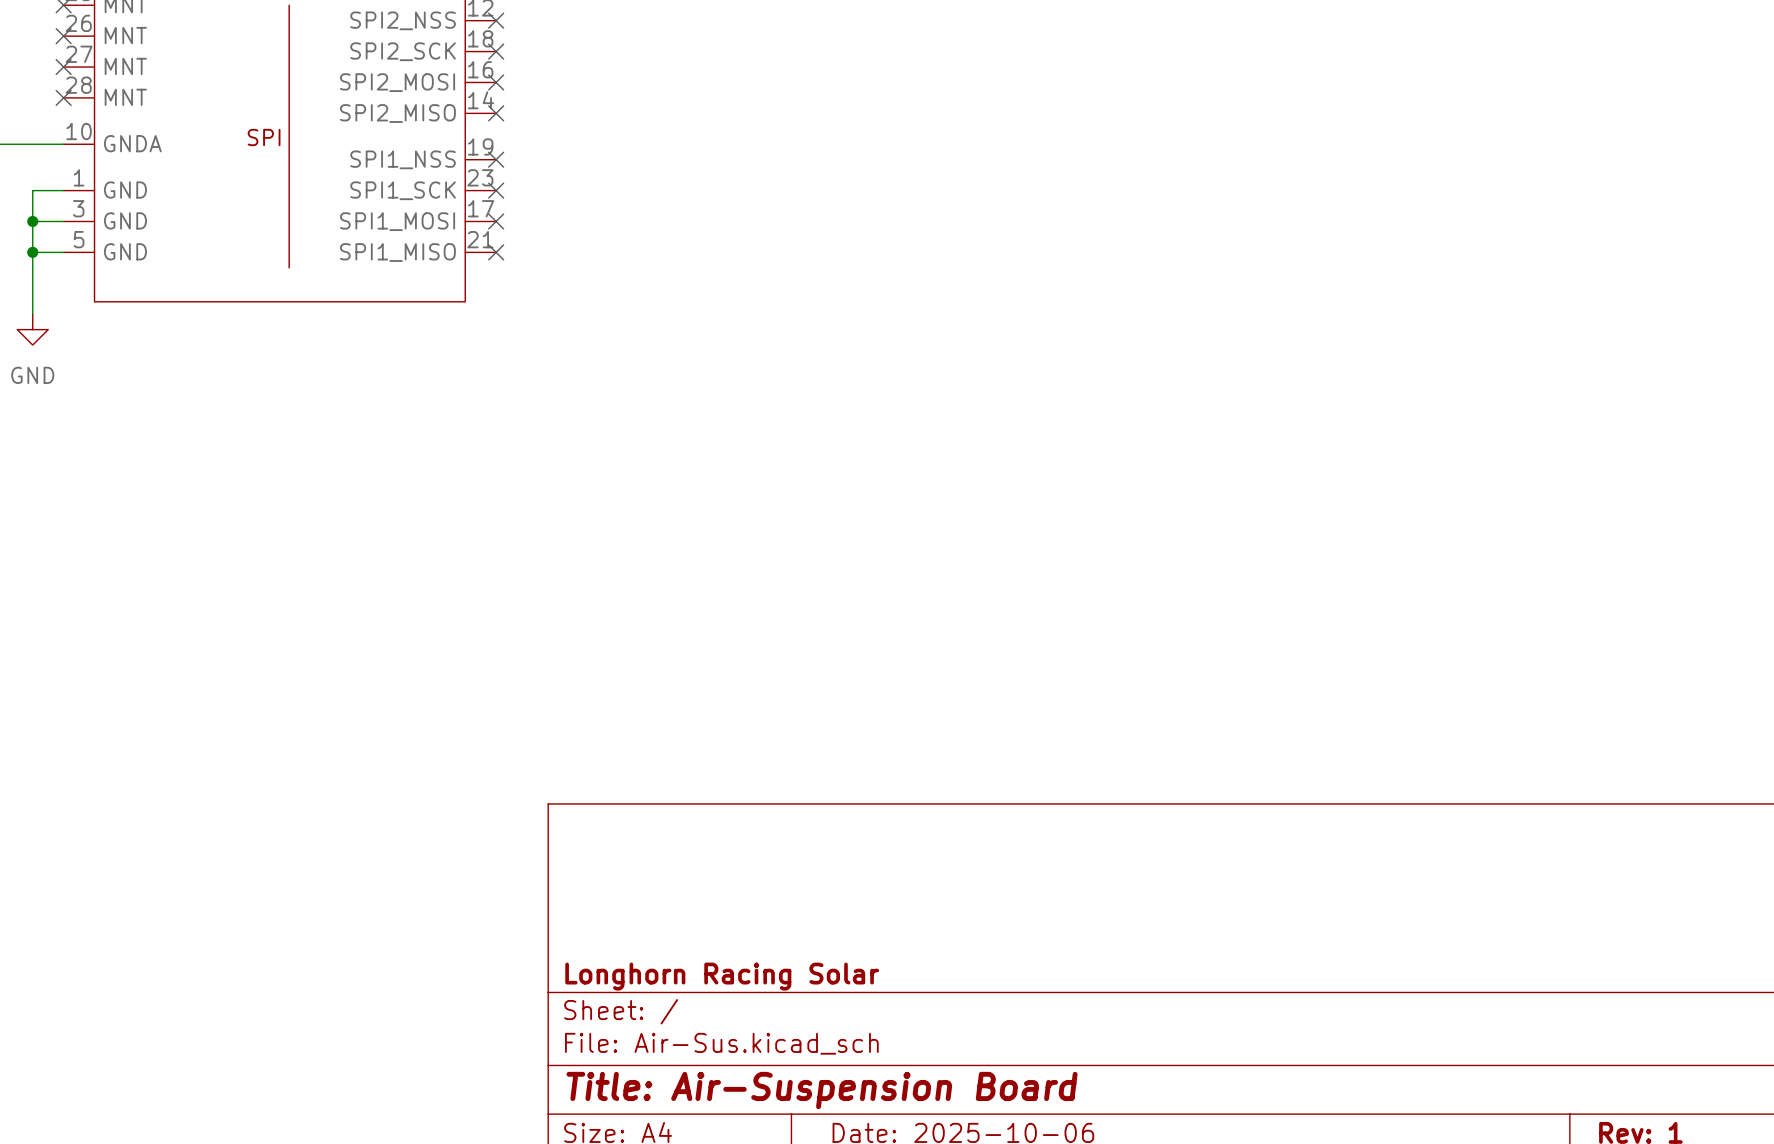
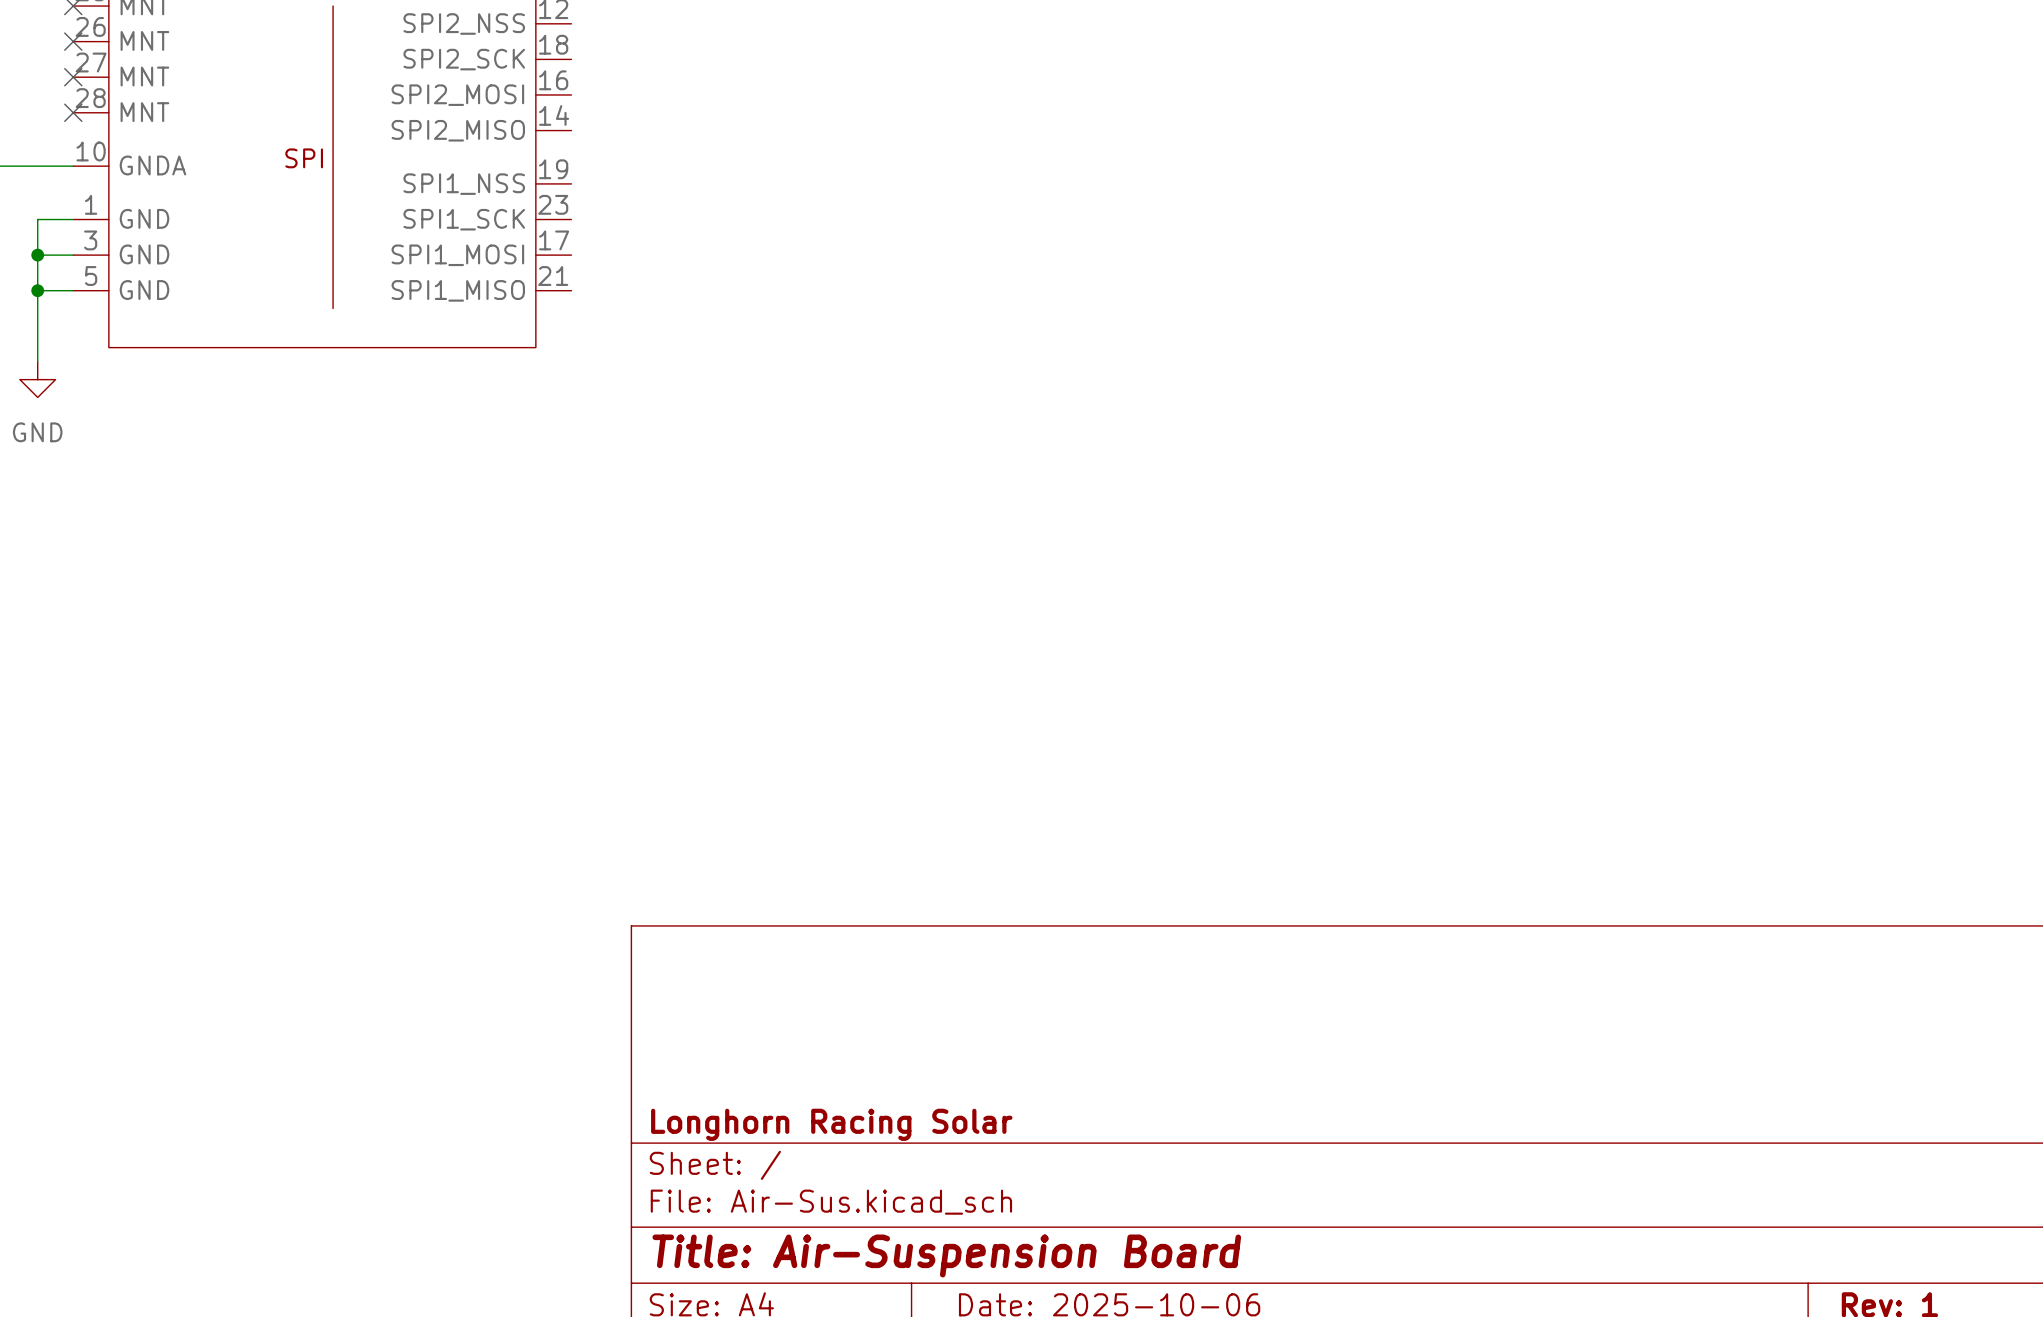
no-connect mark: (496, 20) -> none
no-connect mark: (496, 51) -> none
no-connect mark: (496, 82) -> none
no-connect mark: (496, 113) -> none
no-connect mark: (496, 159) -> none
no-connect mark: (496, 190) -> none
no-connect mark: (496, 221) -> none
no-connect mark: (496, 252) -> none

